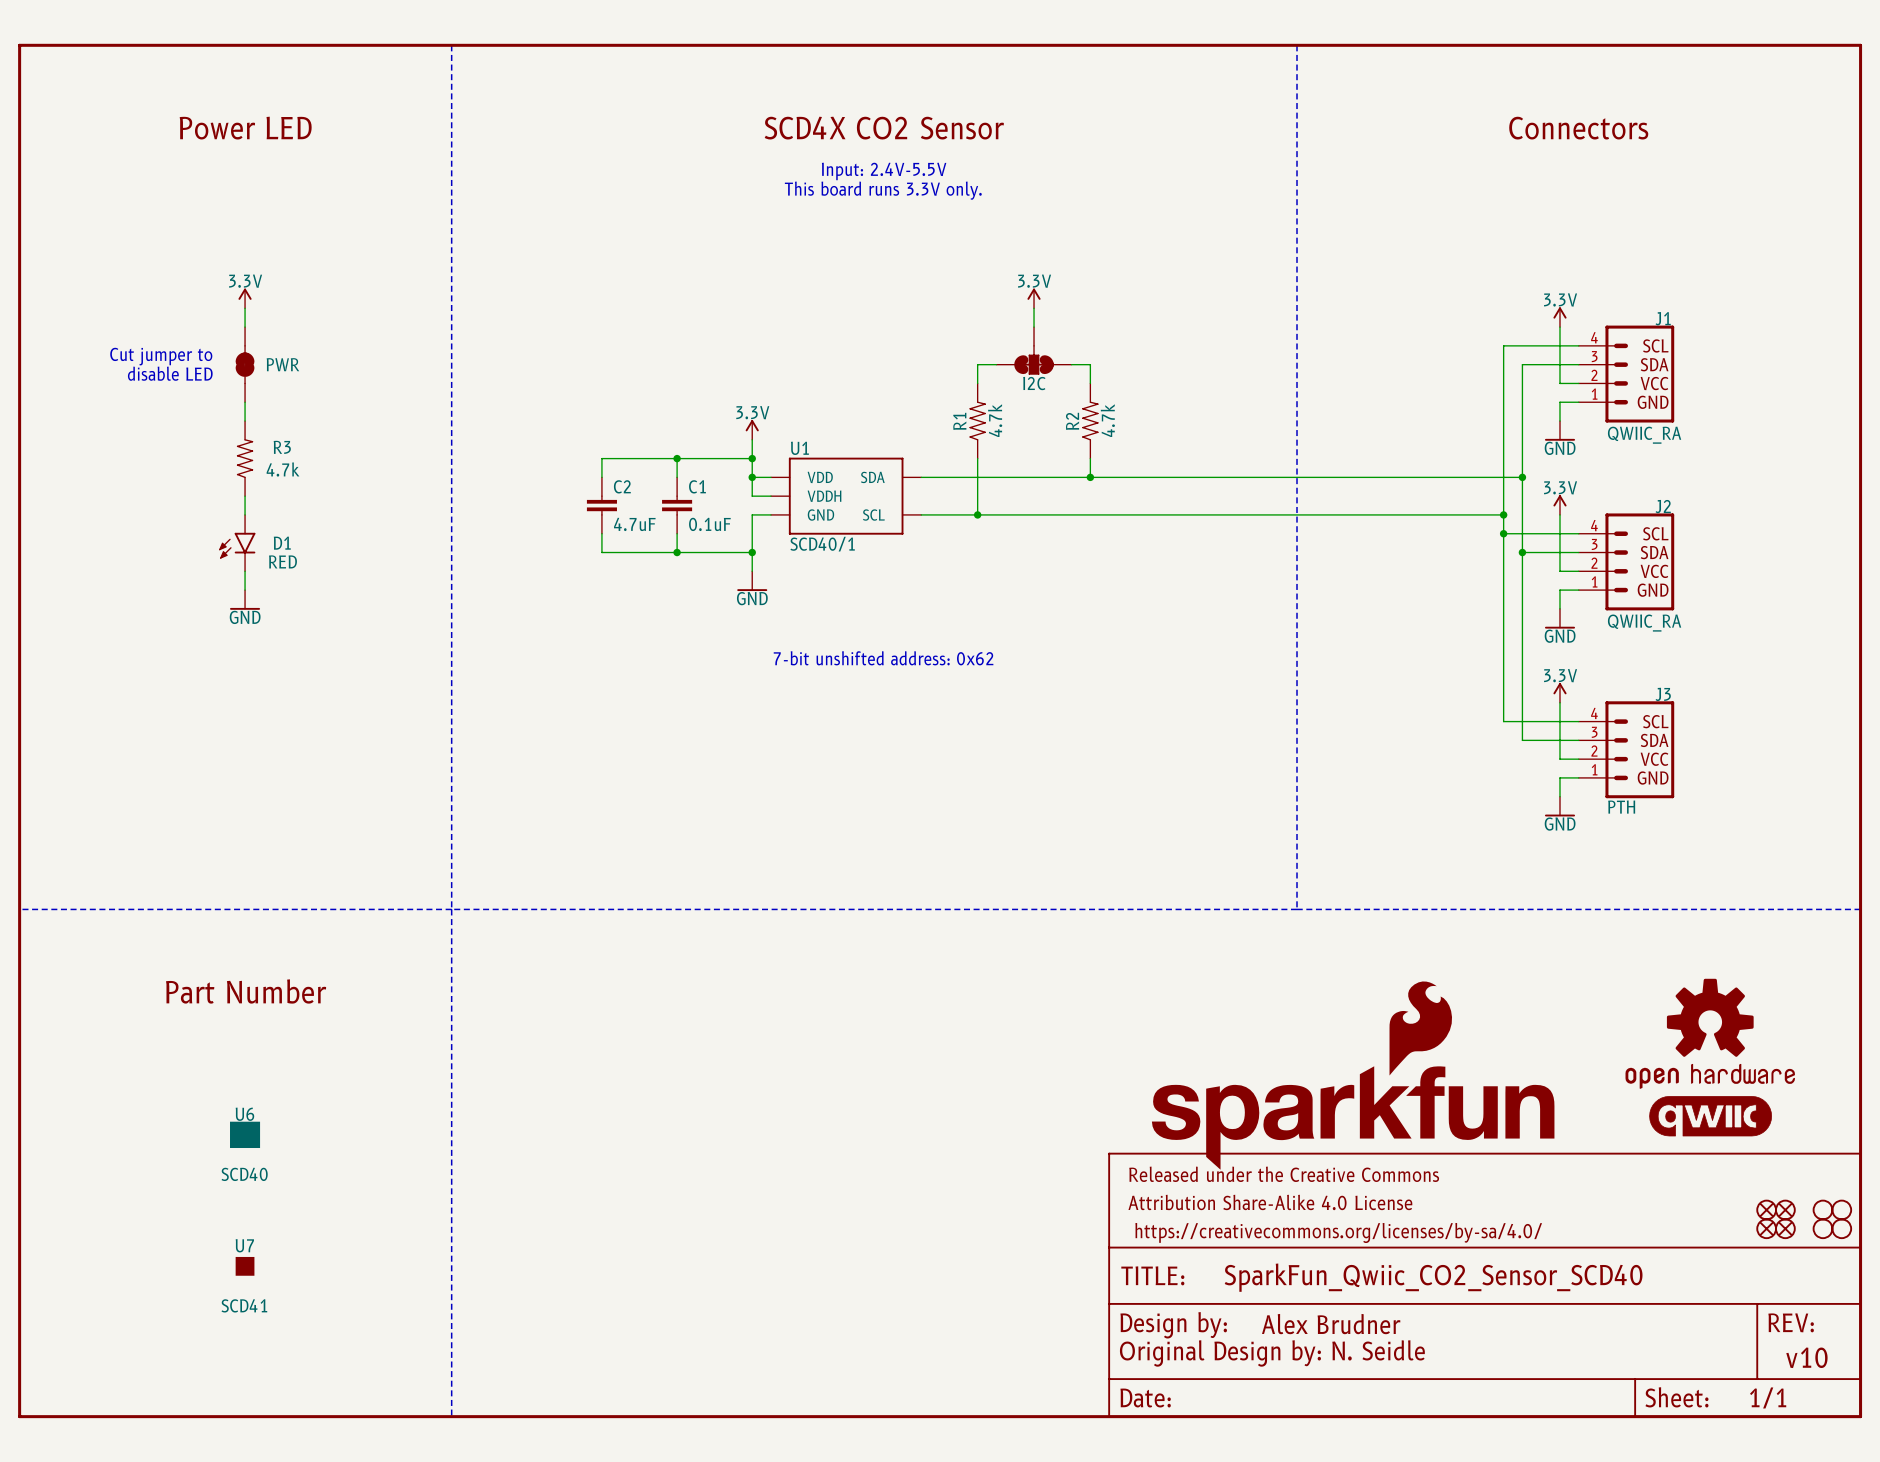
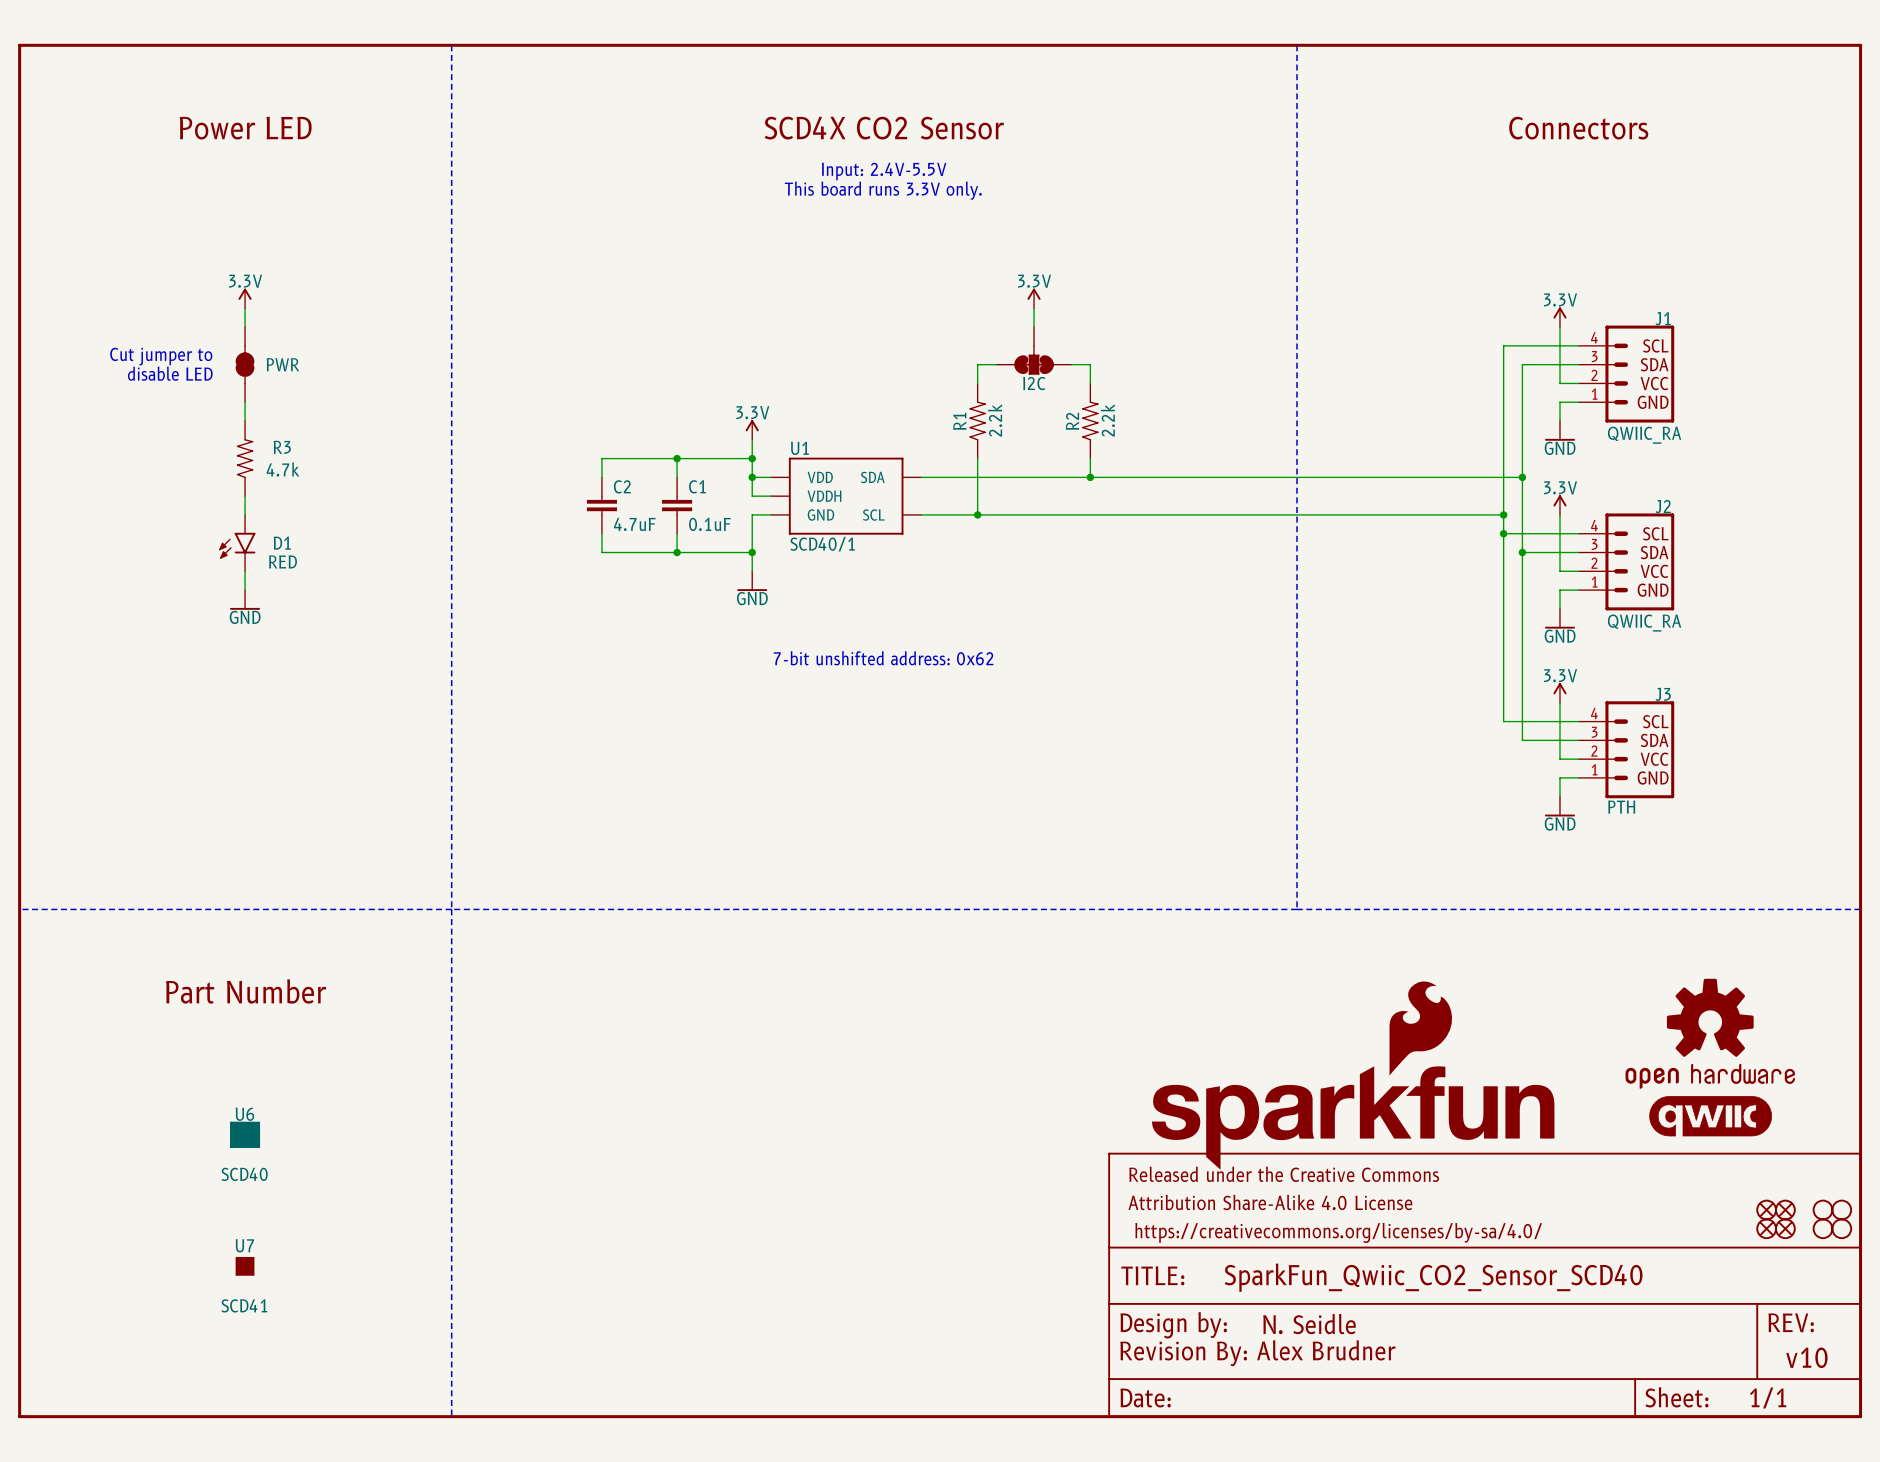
R1 value: 4.7k (995, 420) -> 2.2k (995, 420)
R2 value: 4.7k (1107, 420) -> 2.2k (1107, 420)
part text: Alex Brudner (1331, 1324) -> N. Seidle (1309, 1324)
part text: Original Design by: N. Seidle (1272, 1353) -> Revision By: Alex Brudner (1257, 1353)

